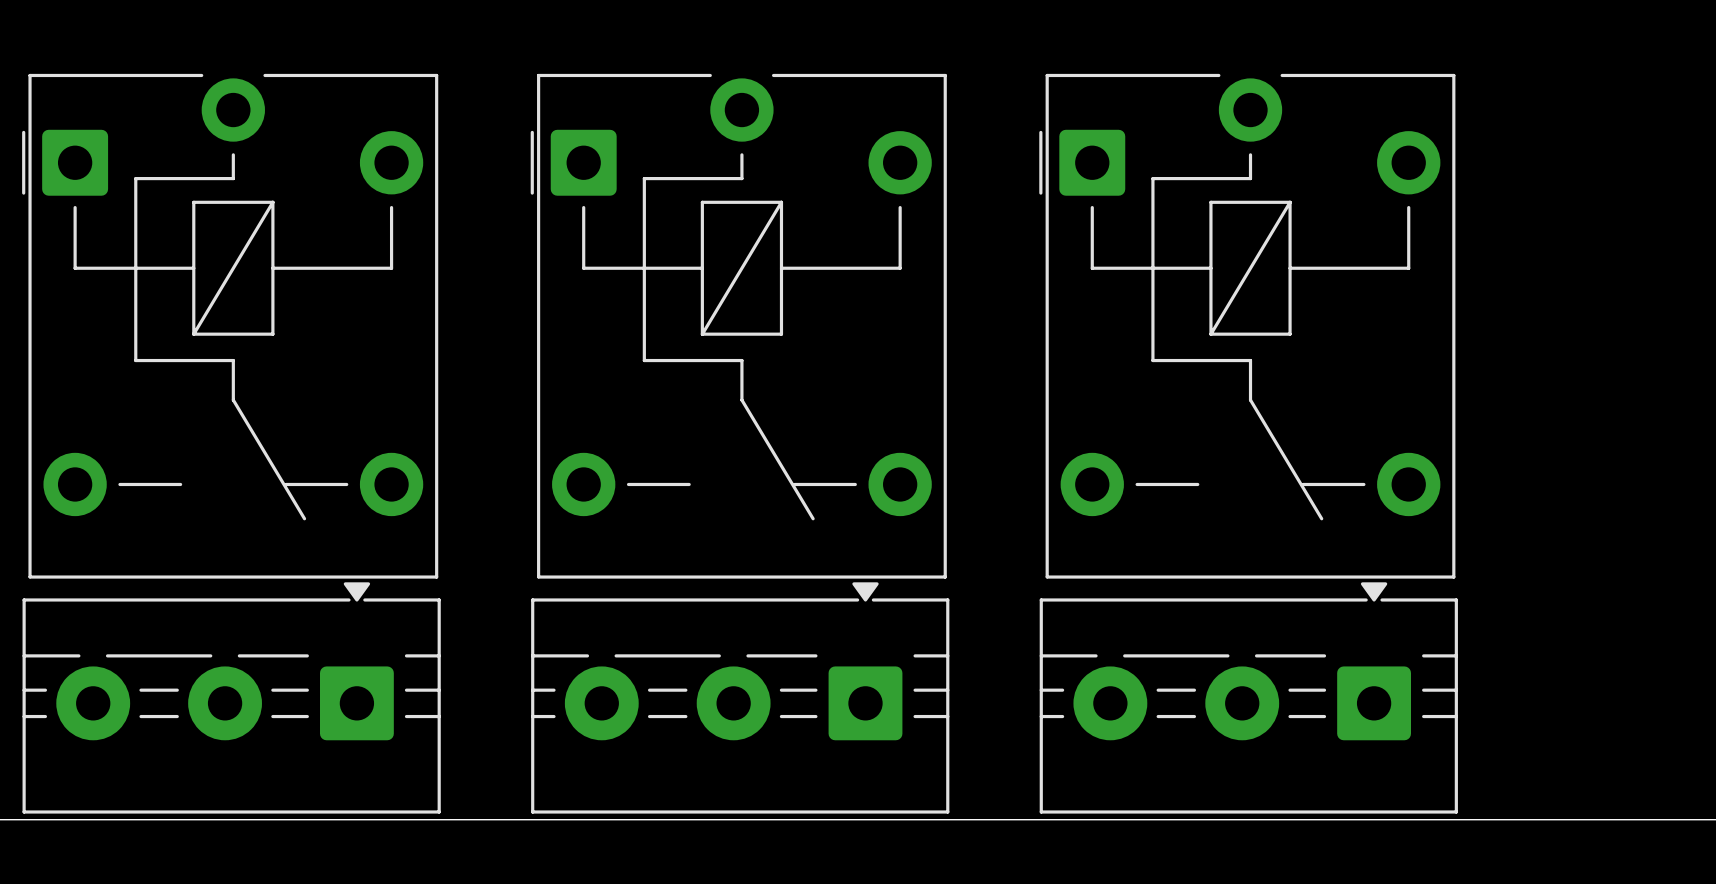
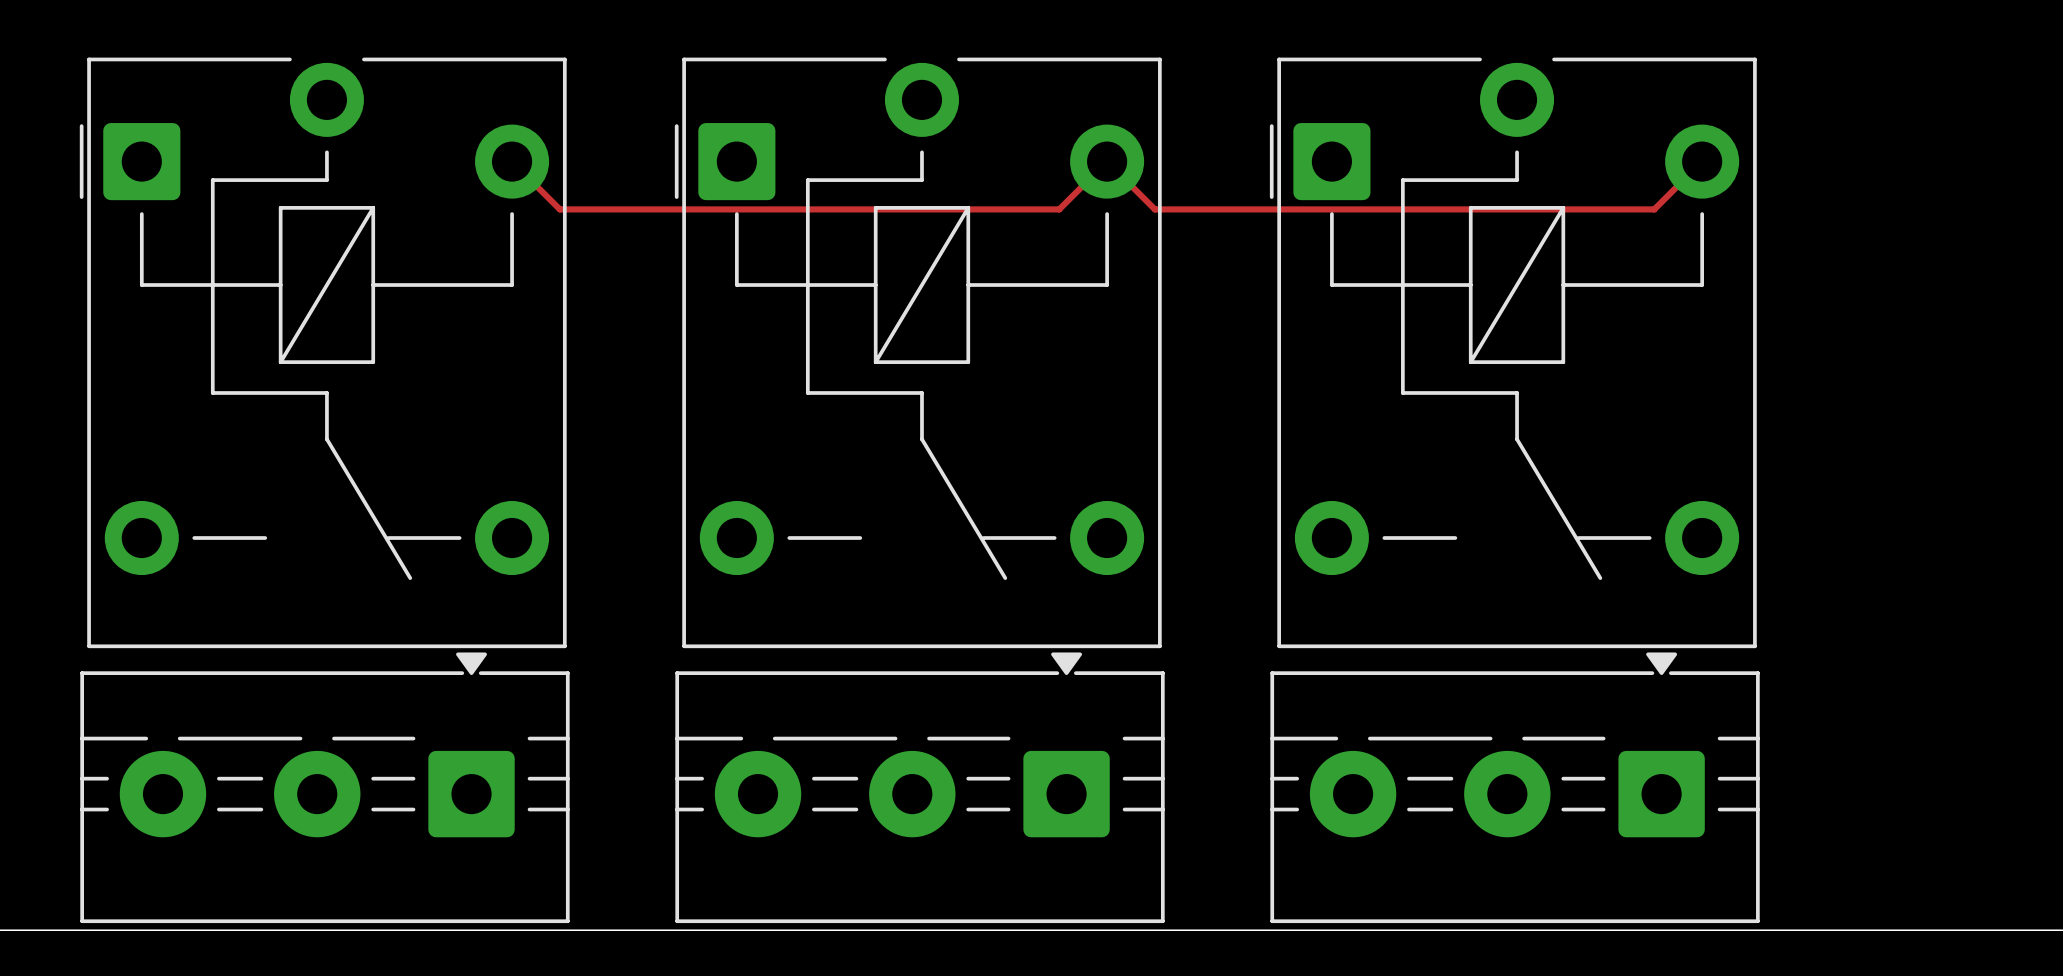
track: none -> (512, 161) (559, 209) (1059, 209) (1107, 161) (1154, 209) (1654, 209) (1702, 161)

